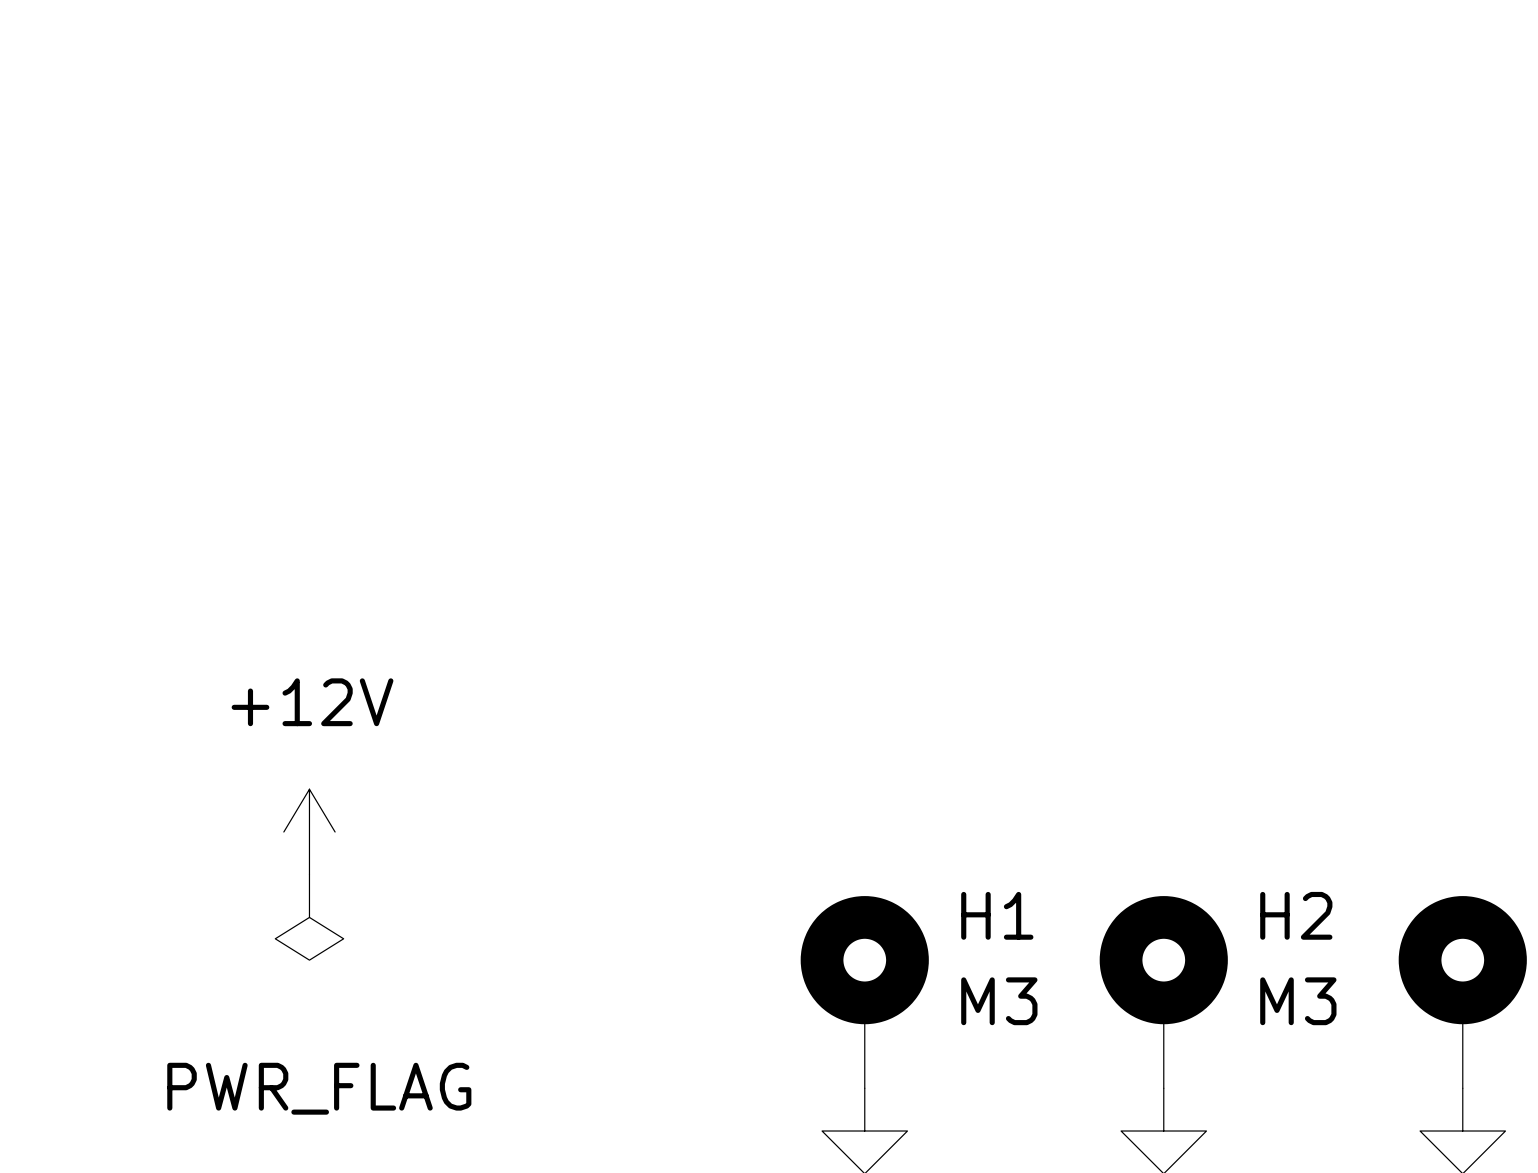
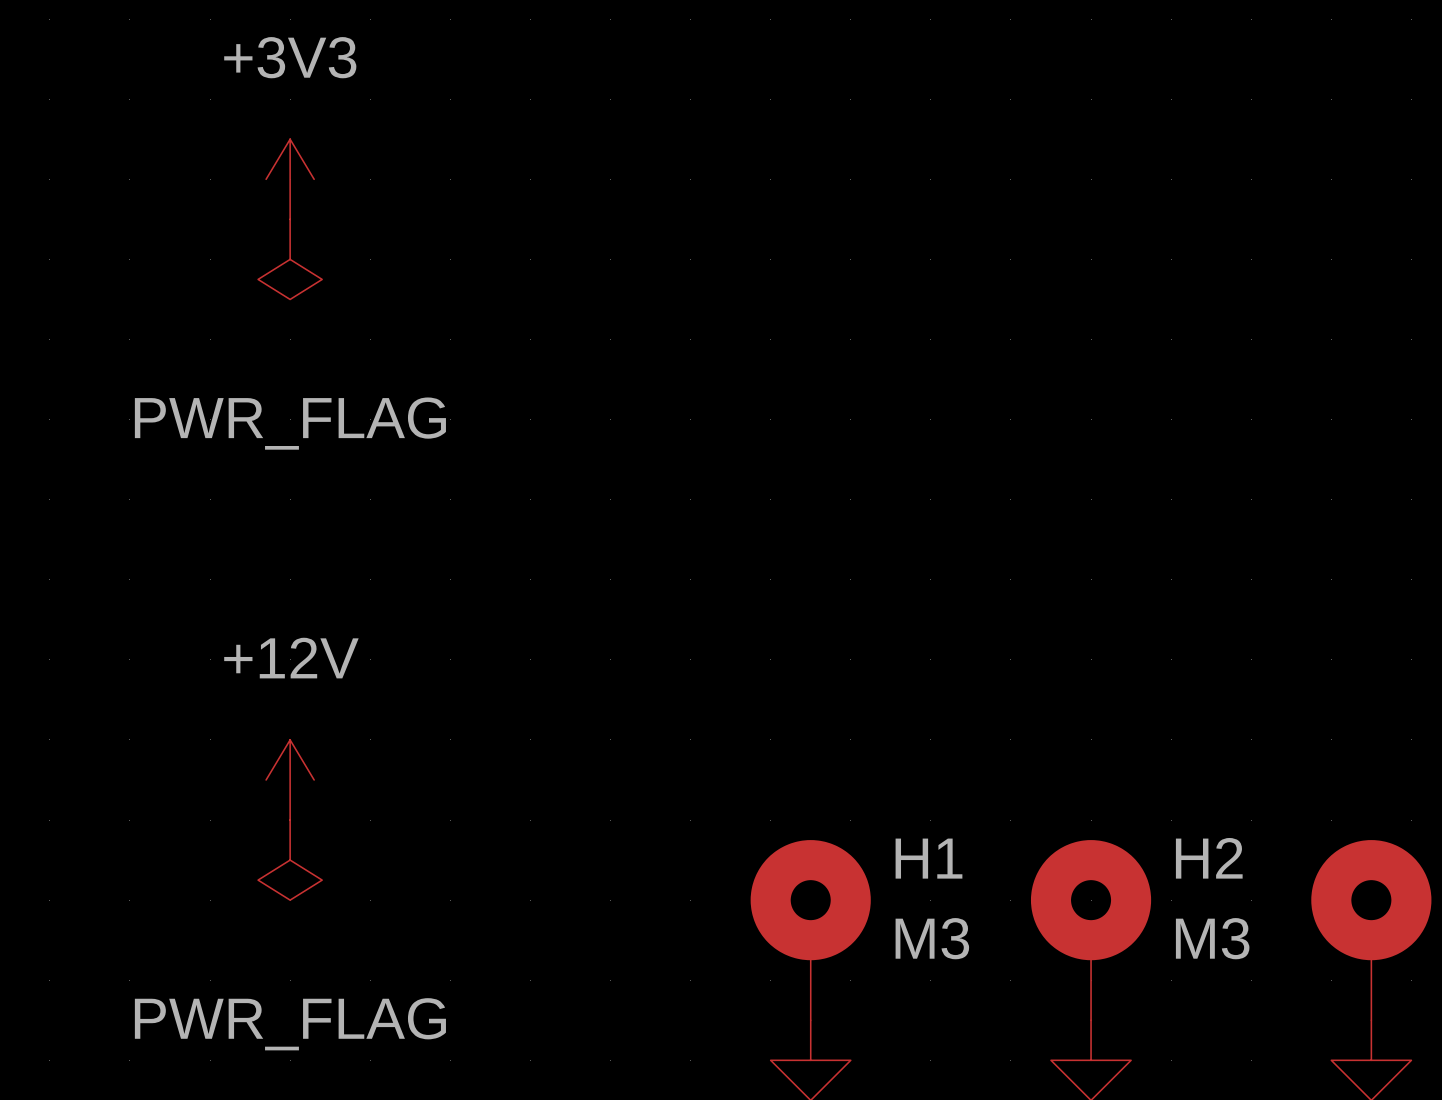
power symbol: none -> +3V3 (290, 179)
power symbol: none -> PWR_FLAG (290, 259)

